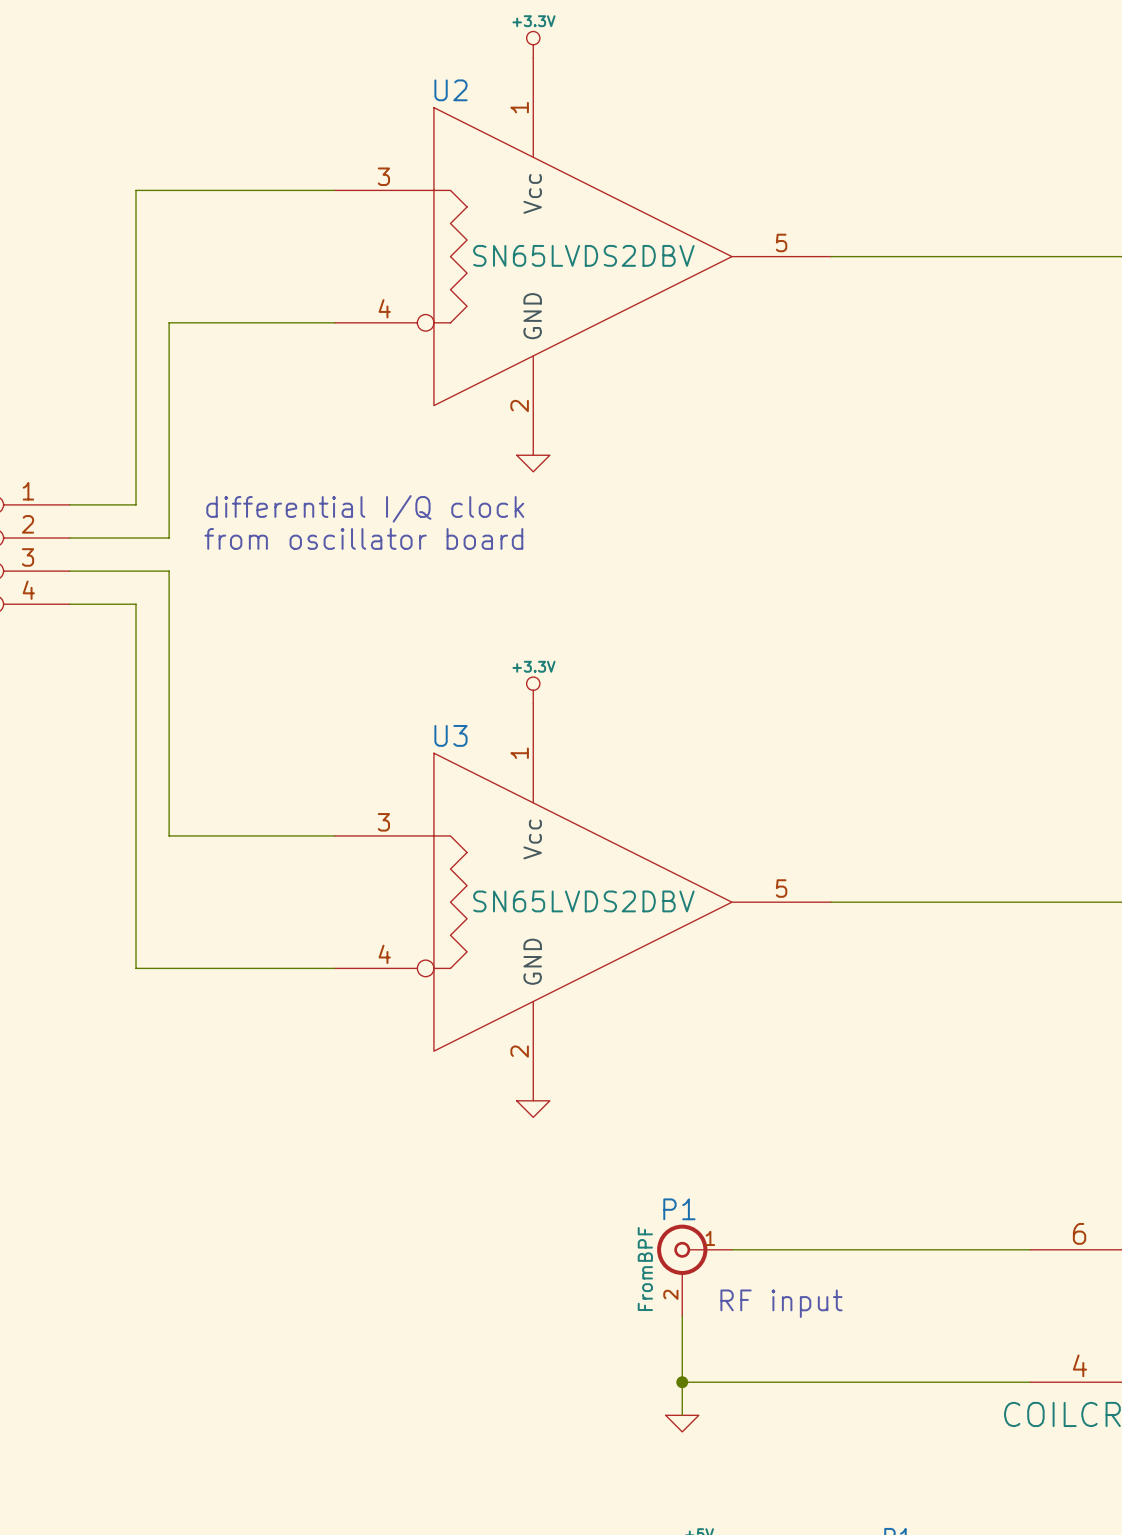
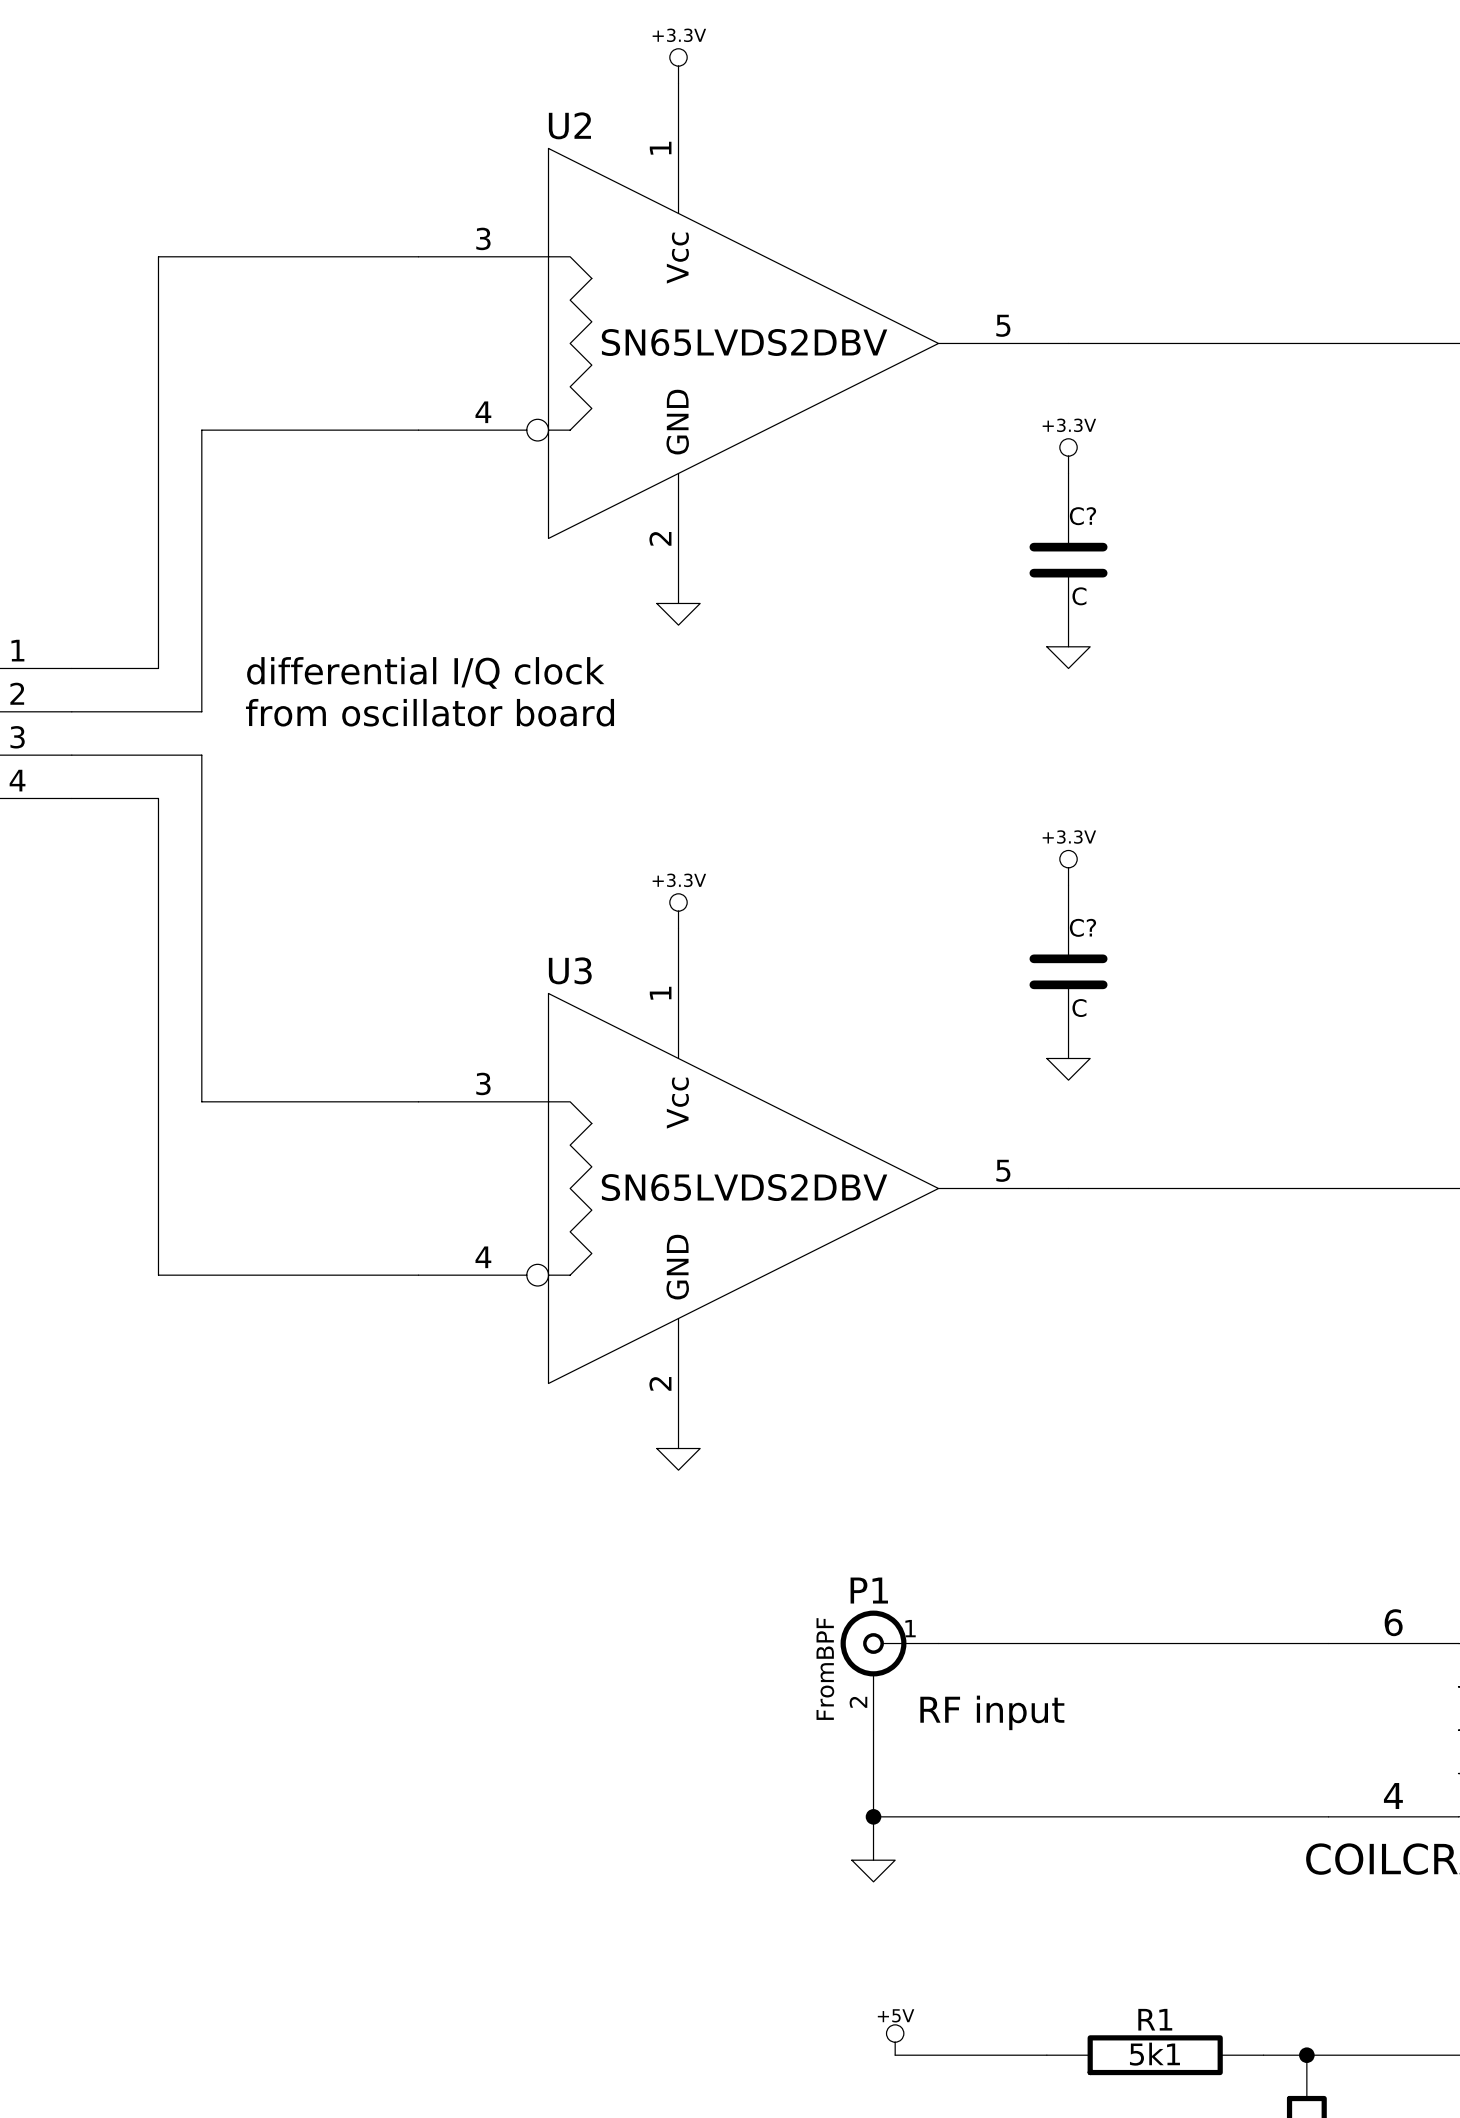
power symbol: none -> +3.3V (1068, 456)
C?: none -> C (1068, 560)
power symbol: none -> (1068, 657)
power symbol: none -> +3.3V (1068, 867)
C?: none -> C (1068, 971)
power symbol: none -> (1068, 1069)

